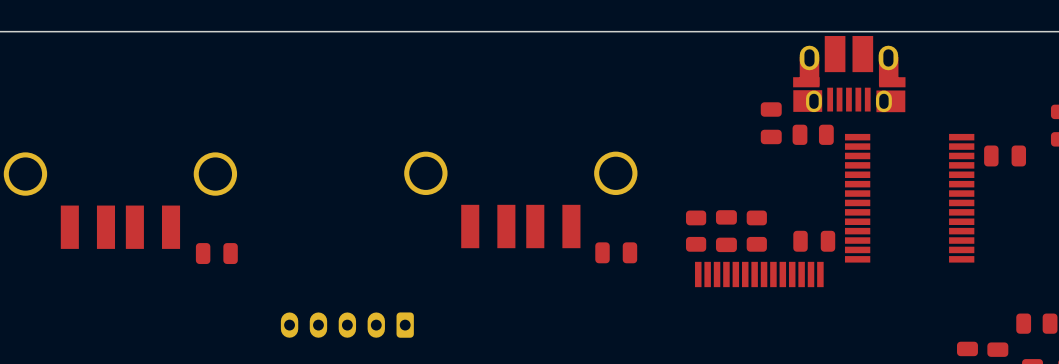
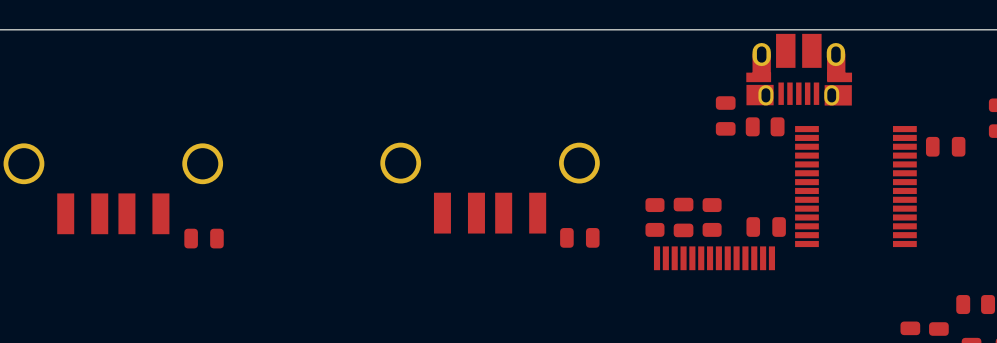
part: (347, 325) -> none

